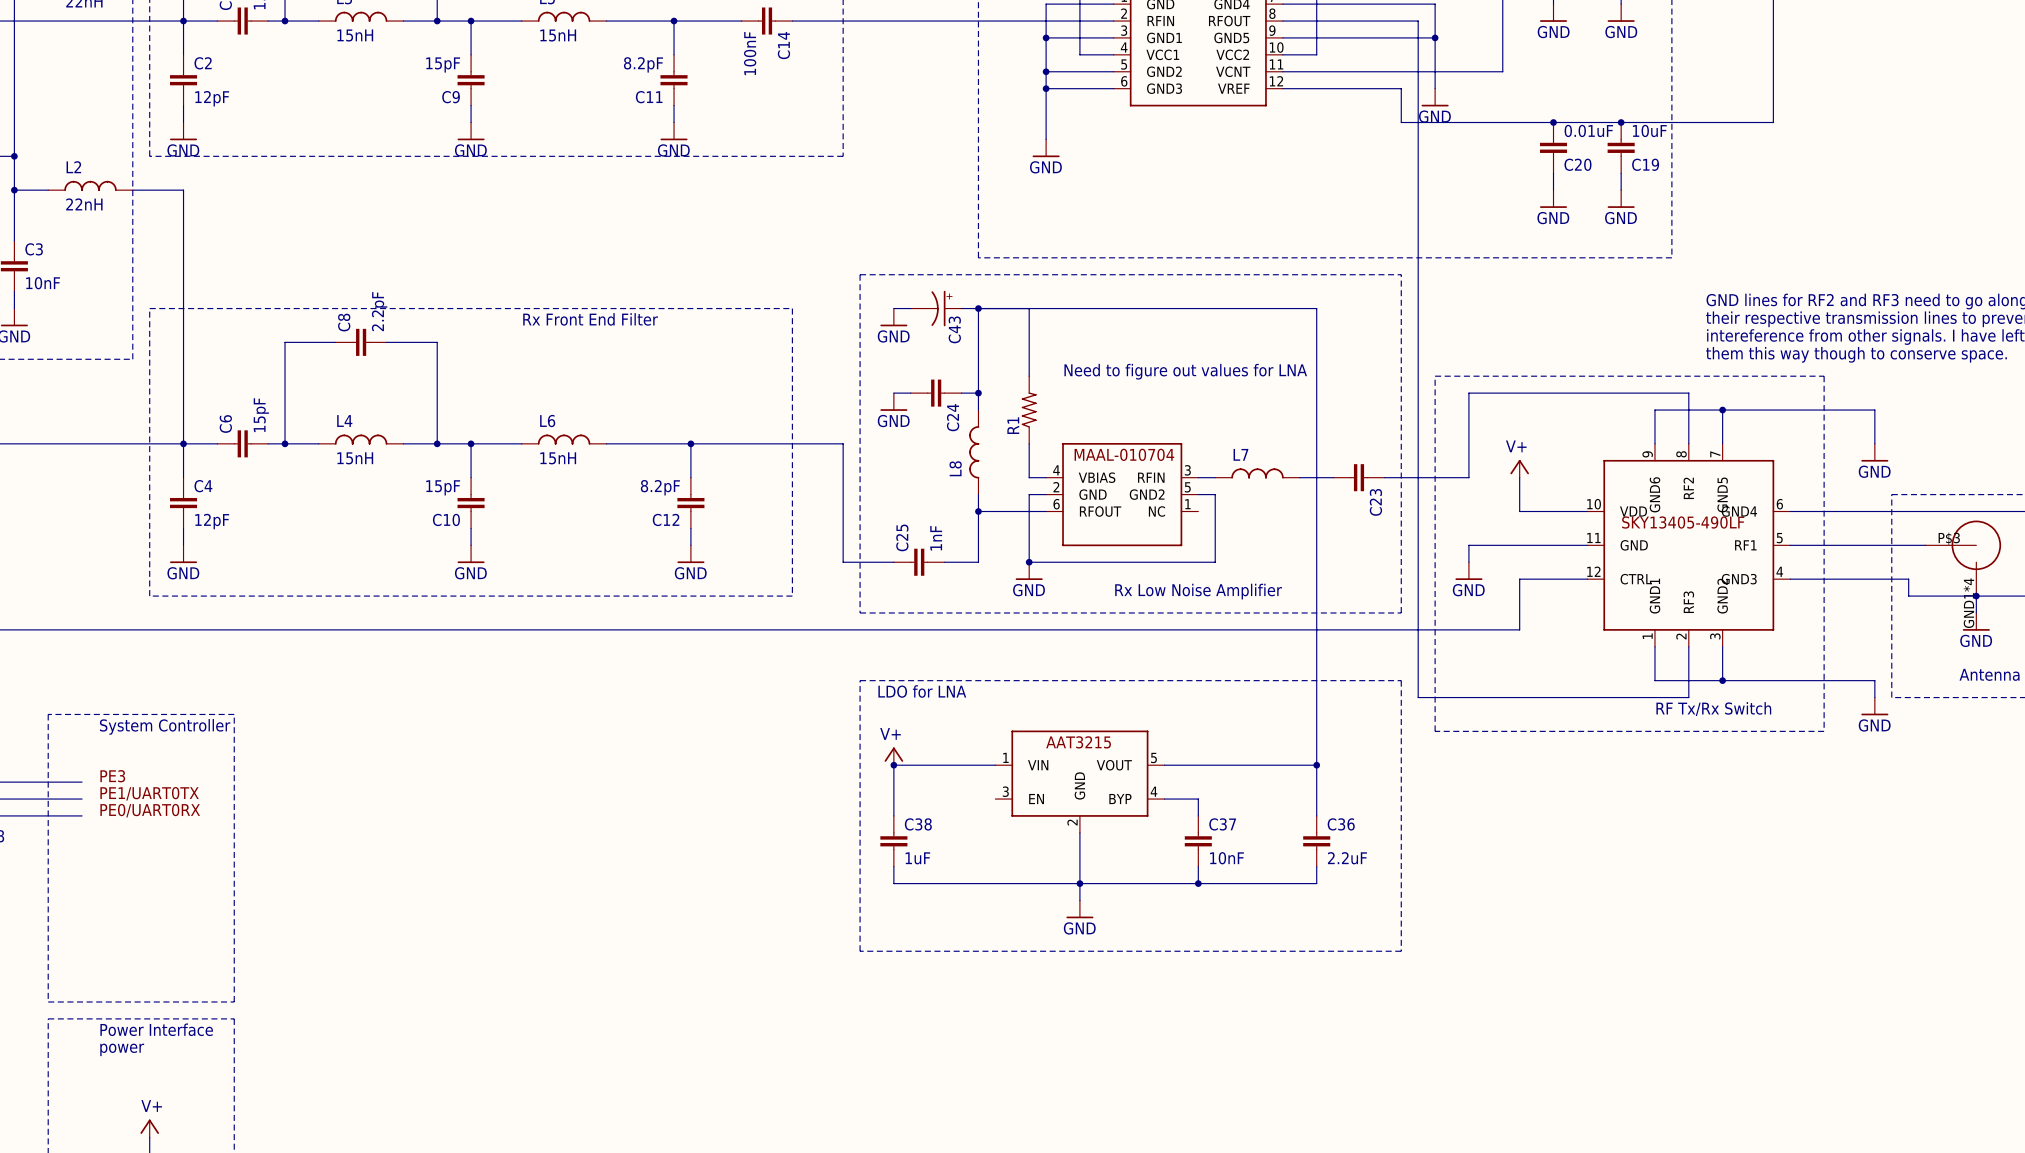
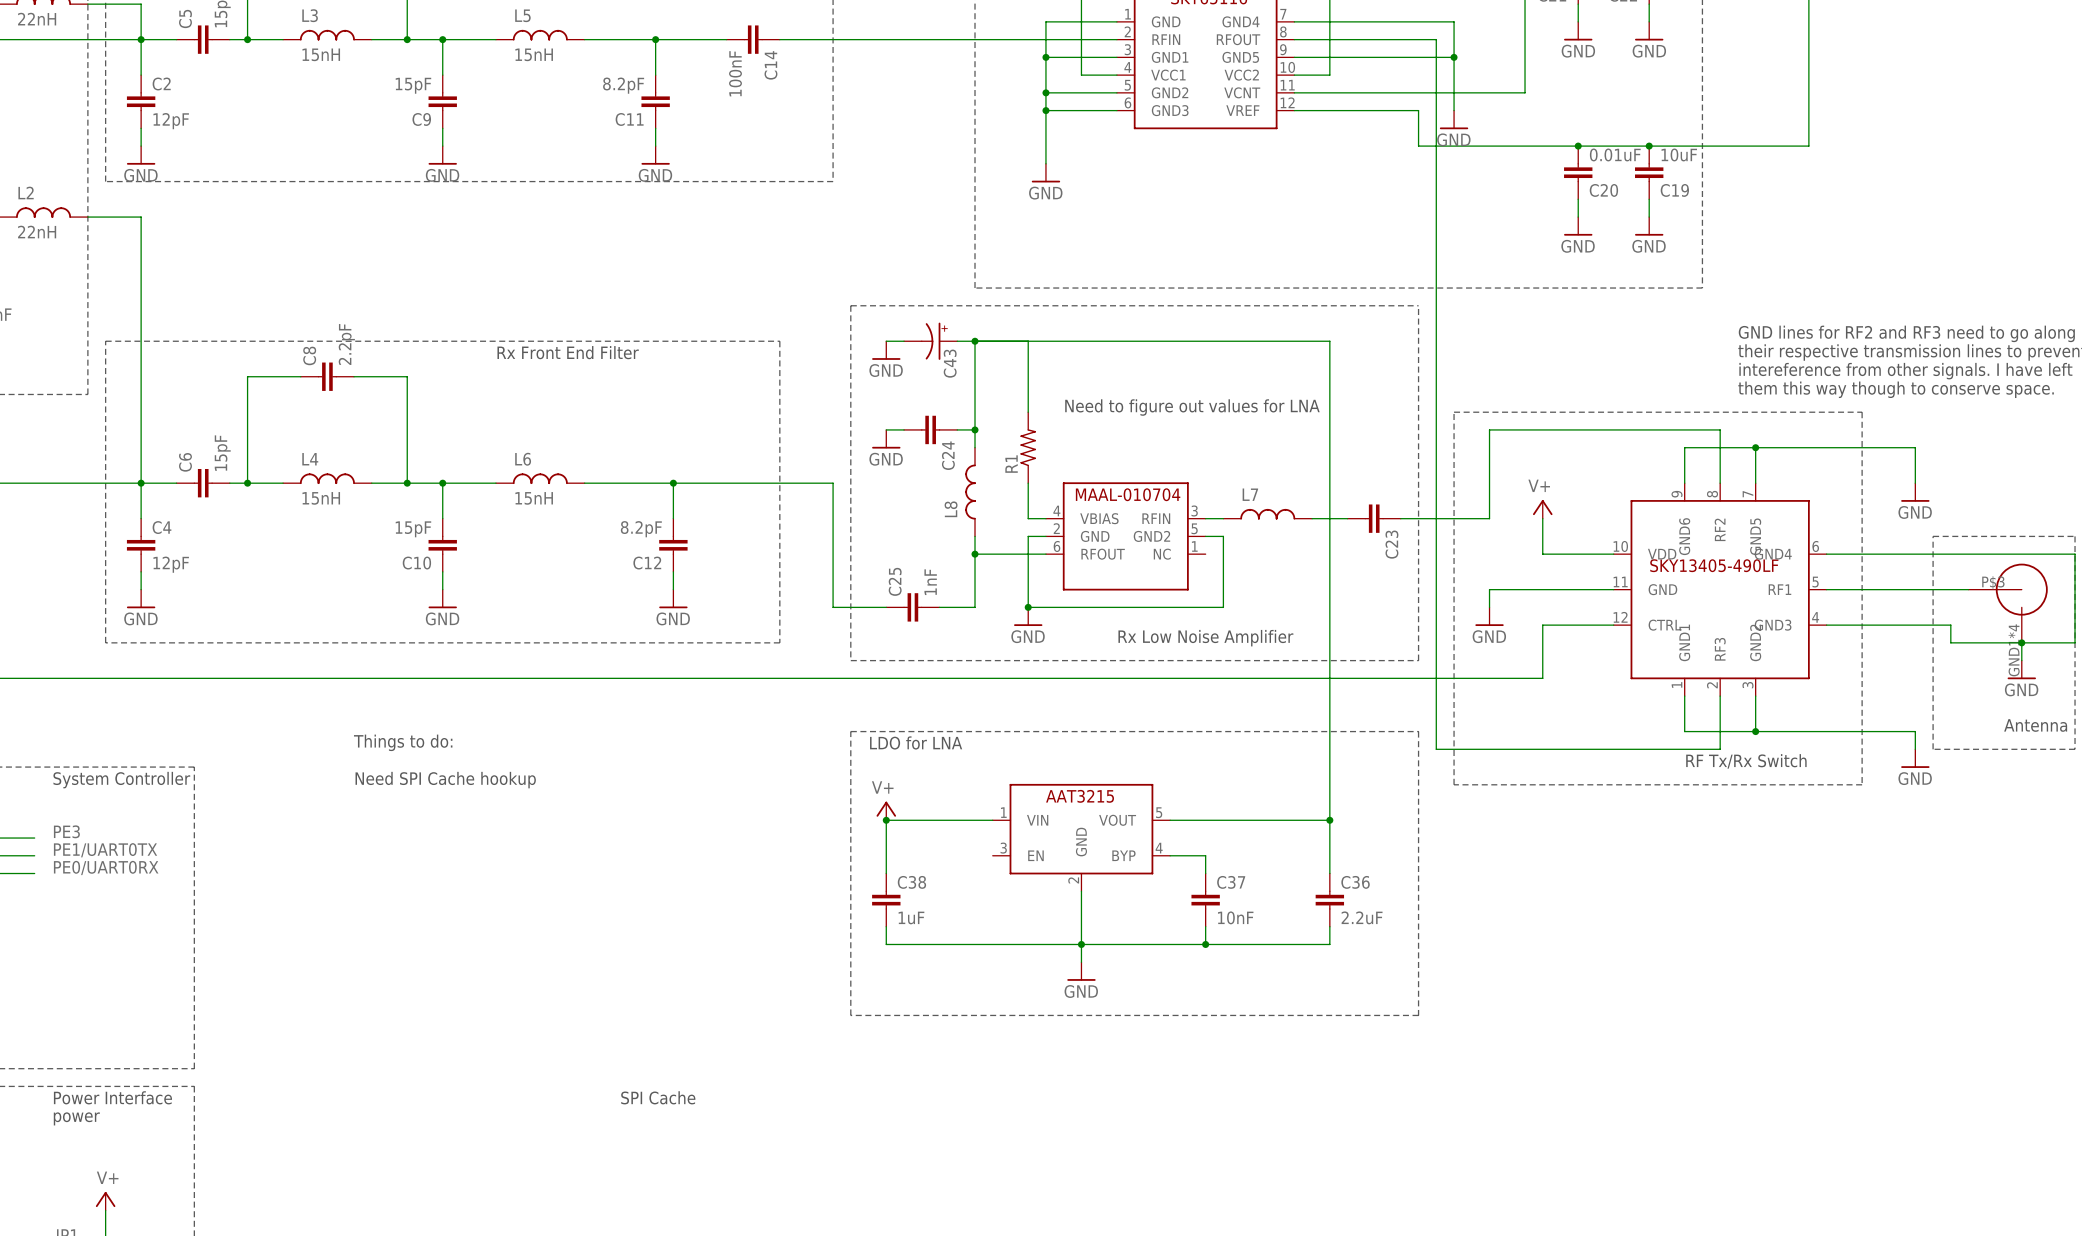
text: none -> Things to do: (403, 742)
text: none -> Need SPI Cache hookup (445, 780)
text: none -> SPI Cache (658, 1097)

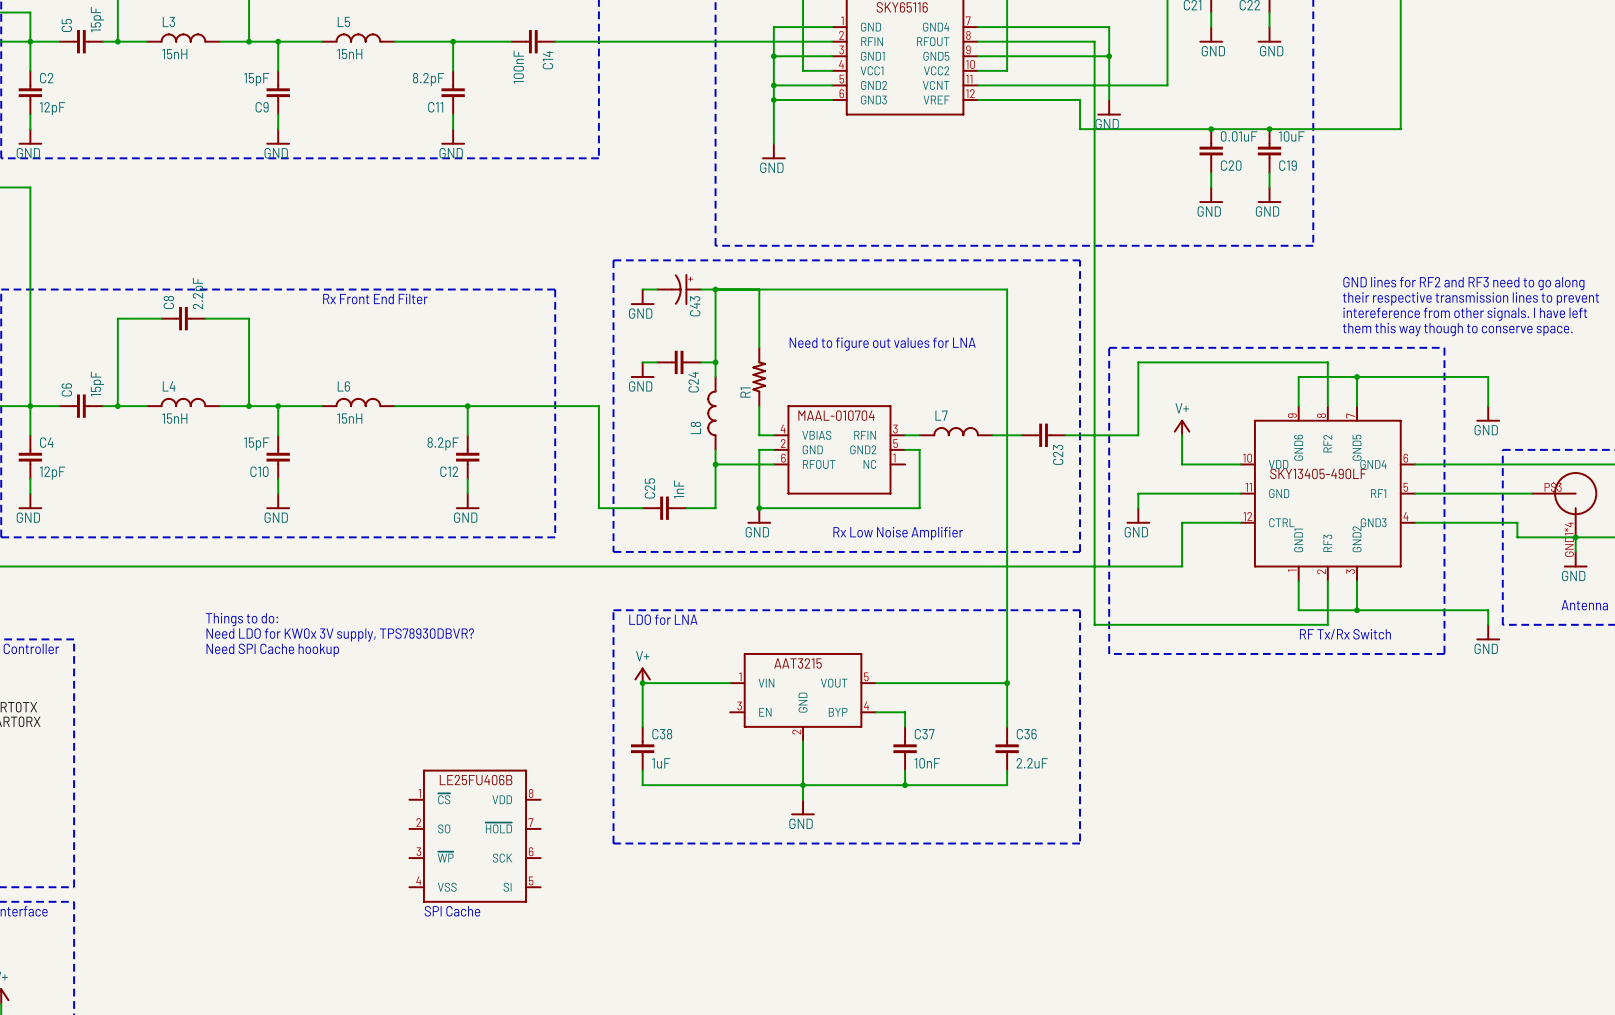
text: none -> Need LDO for KW0x 3V supply, TPS78930DBVR? (340, 634)
part: none -> (475, 836)

